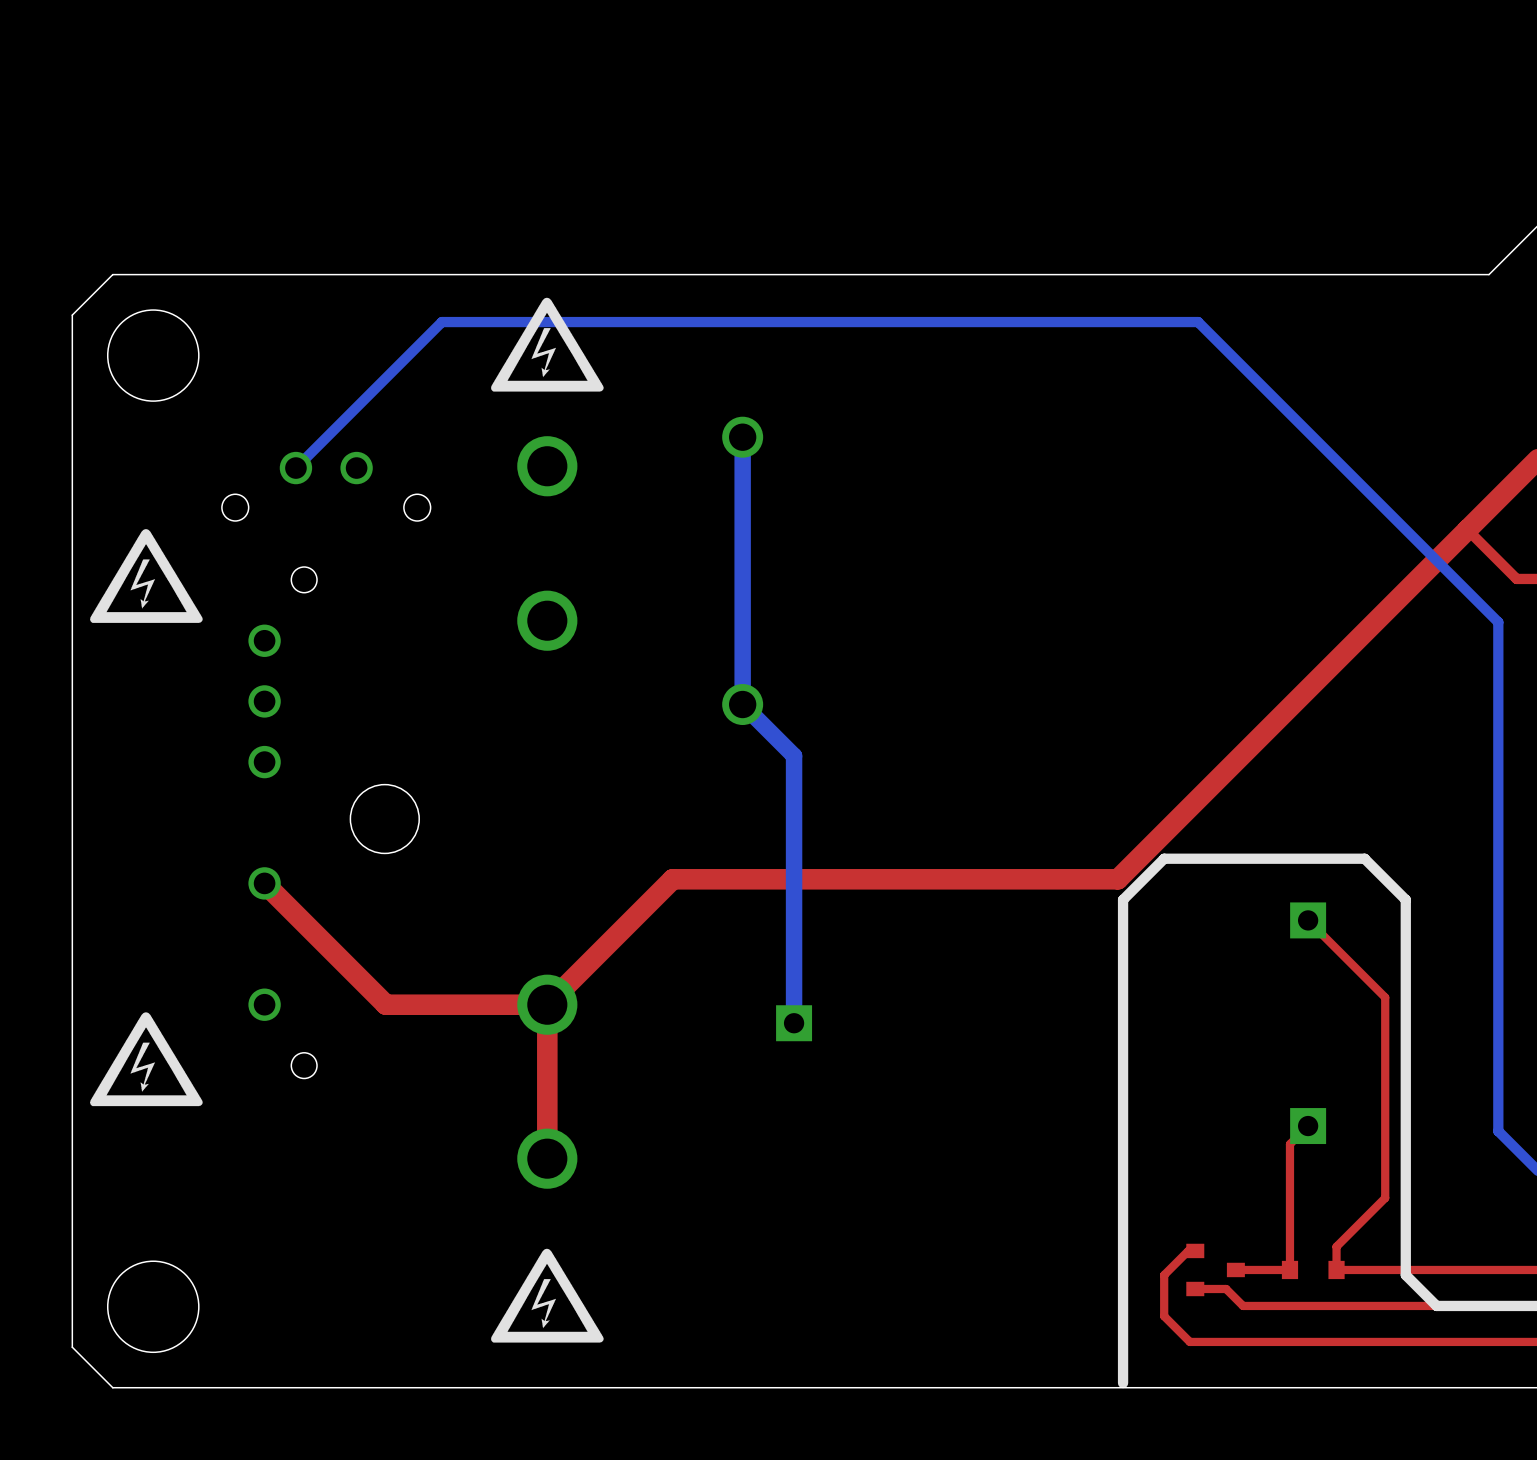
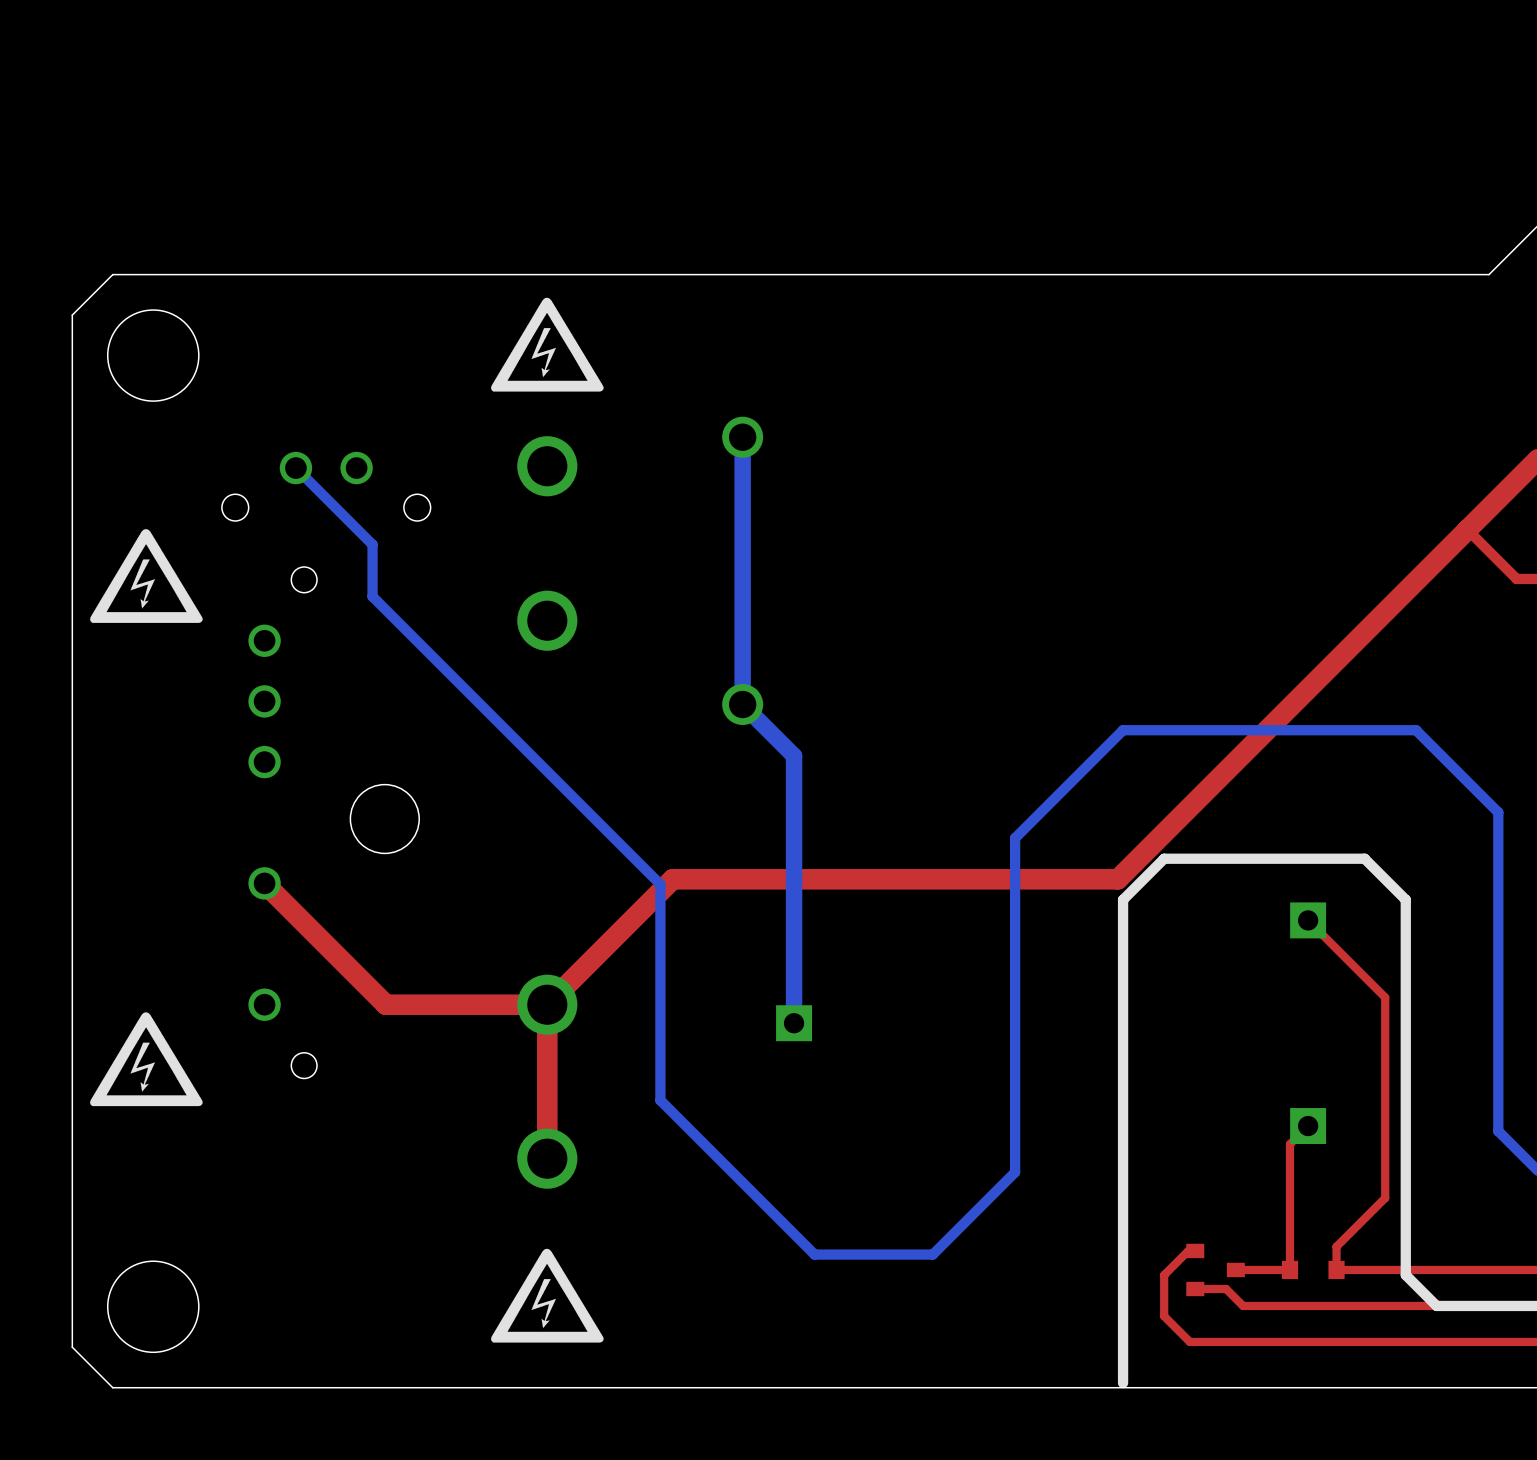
bottom track: (295, 468) (441, 322) (1198, 322) (1498, 622) (1498, 812) -> (295, 468) (372, 544) (372, 596) (660, 884) (660, 1100) (814, 1254) (932, 1254) (1015, 1172) (1015, 838) (1123, 730) (1416, 730) (1498, 812)

